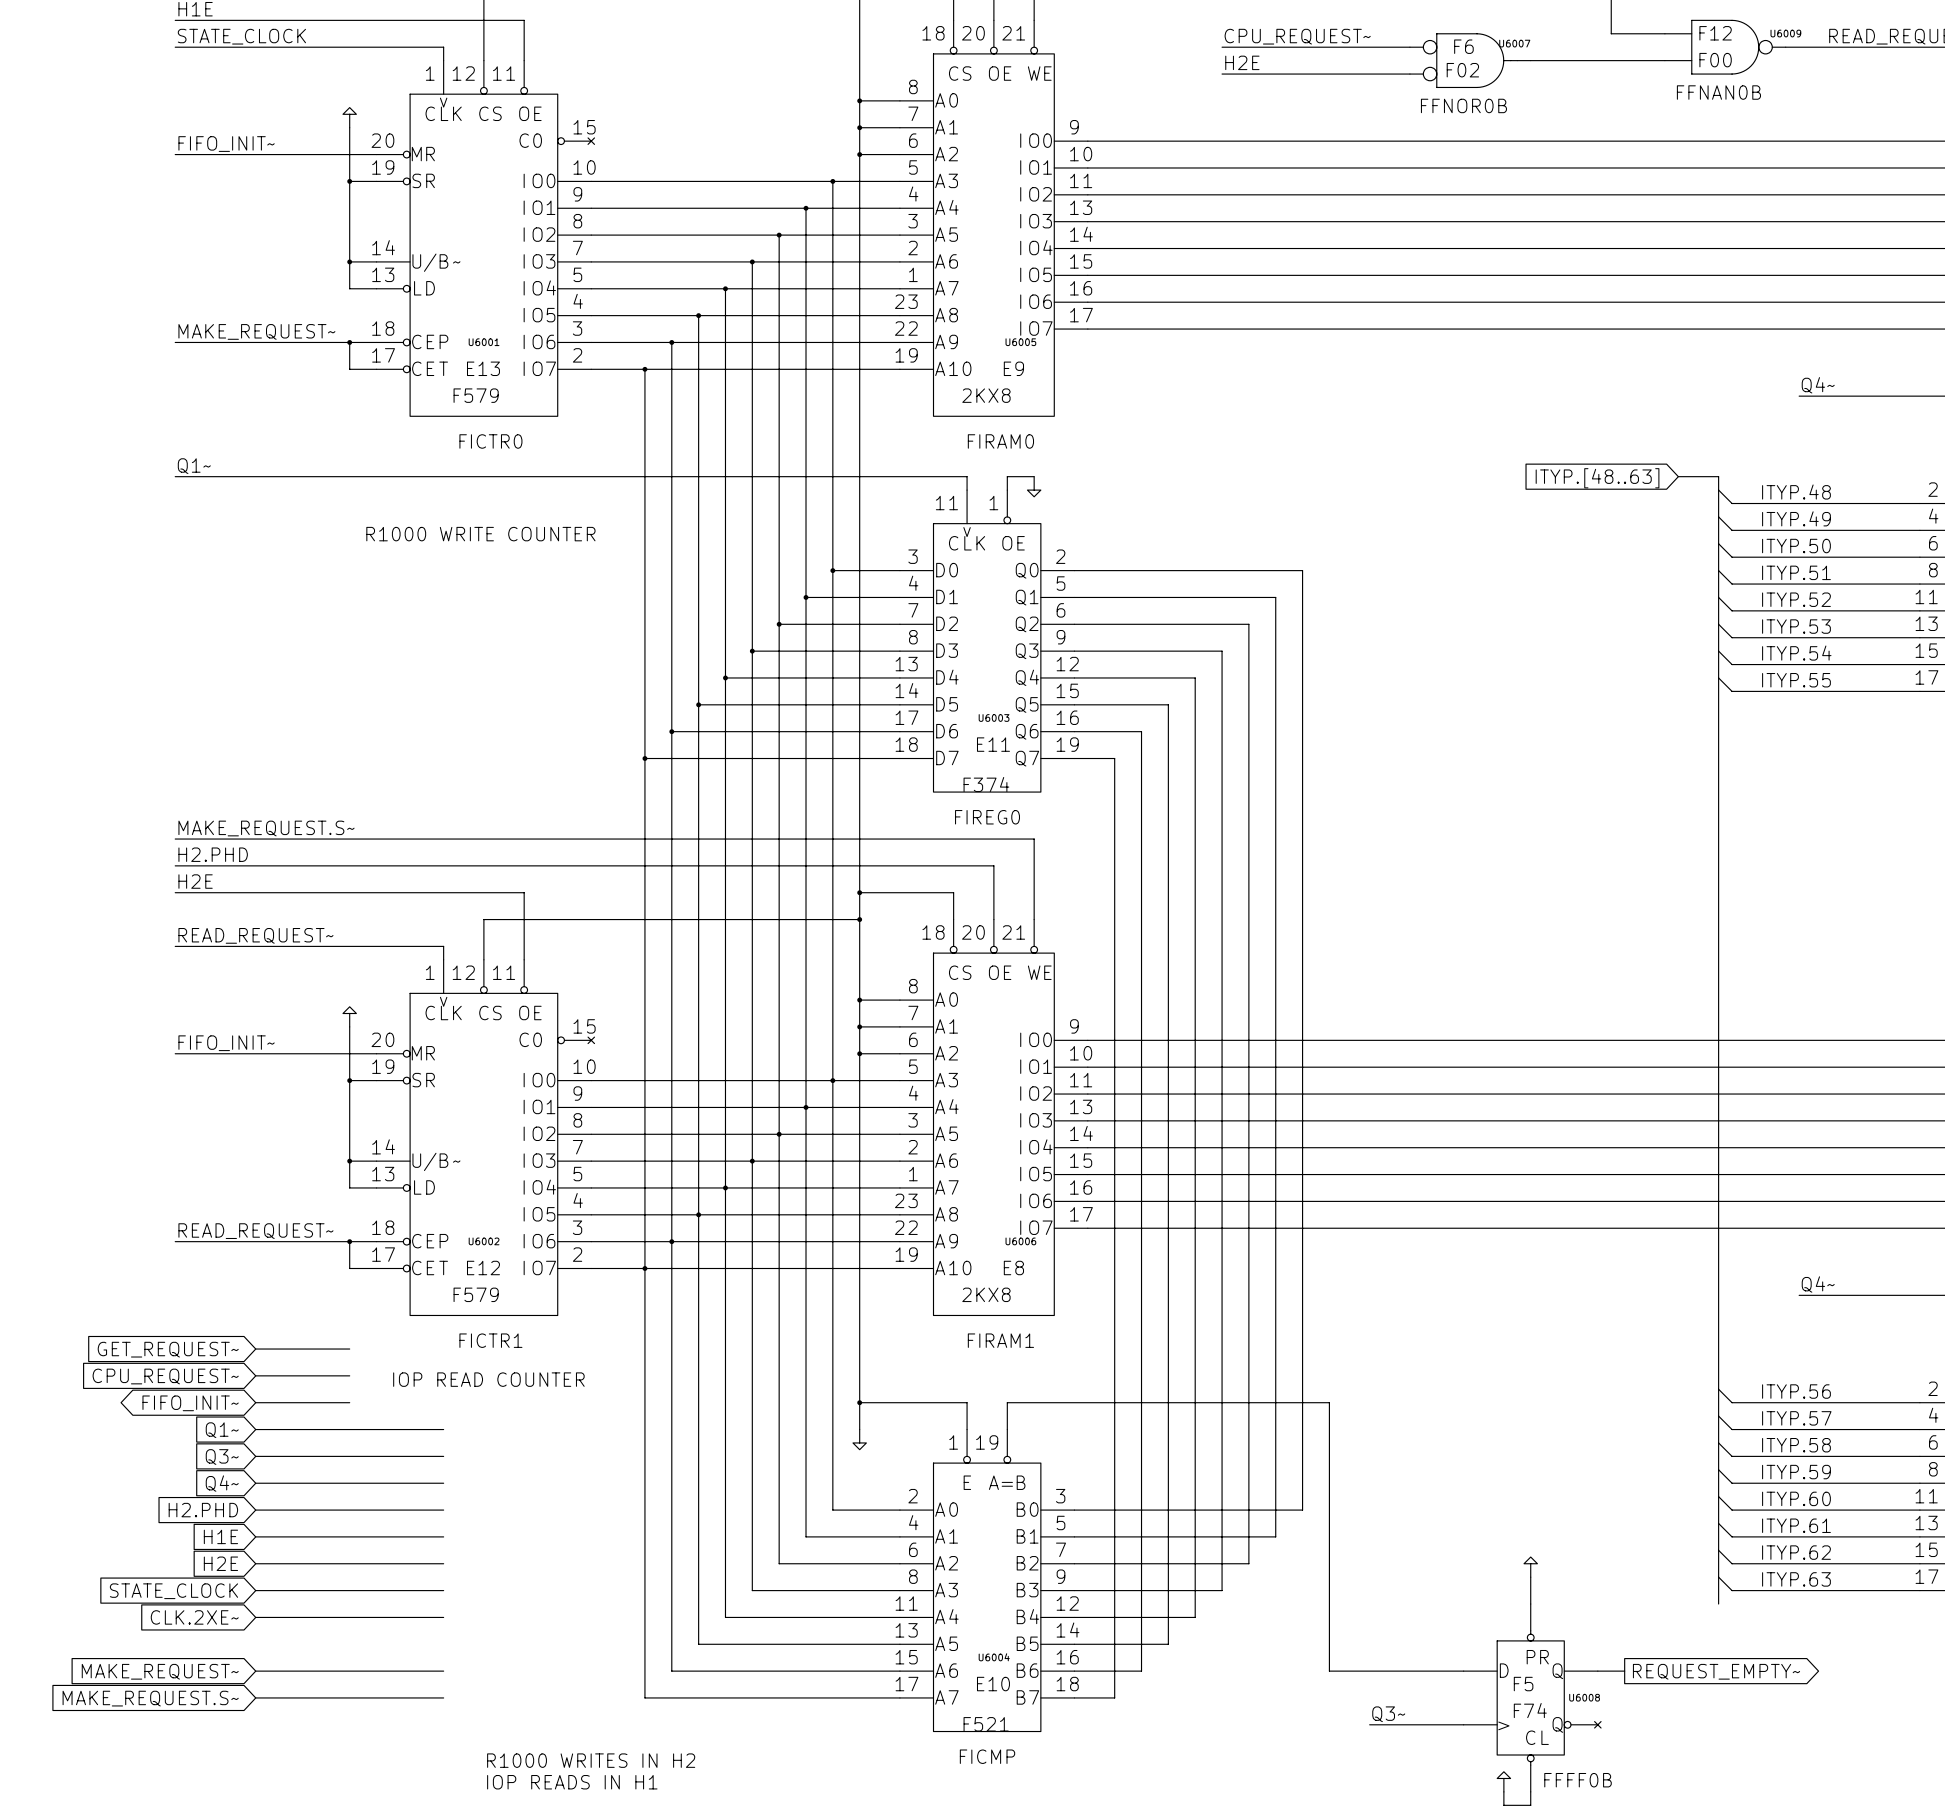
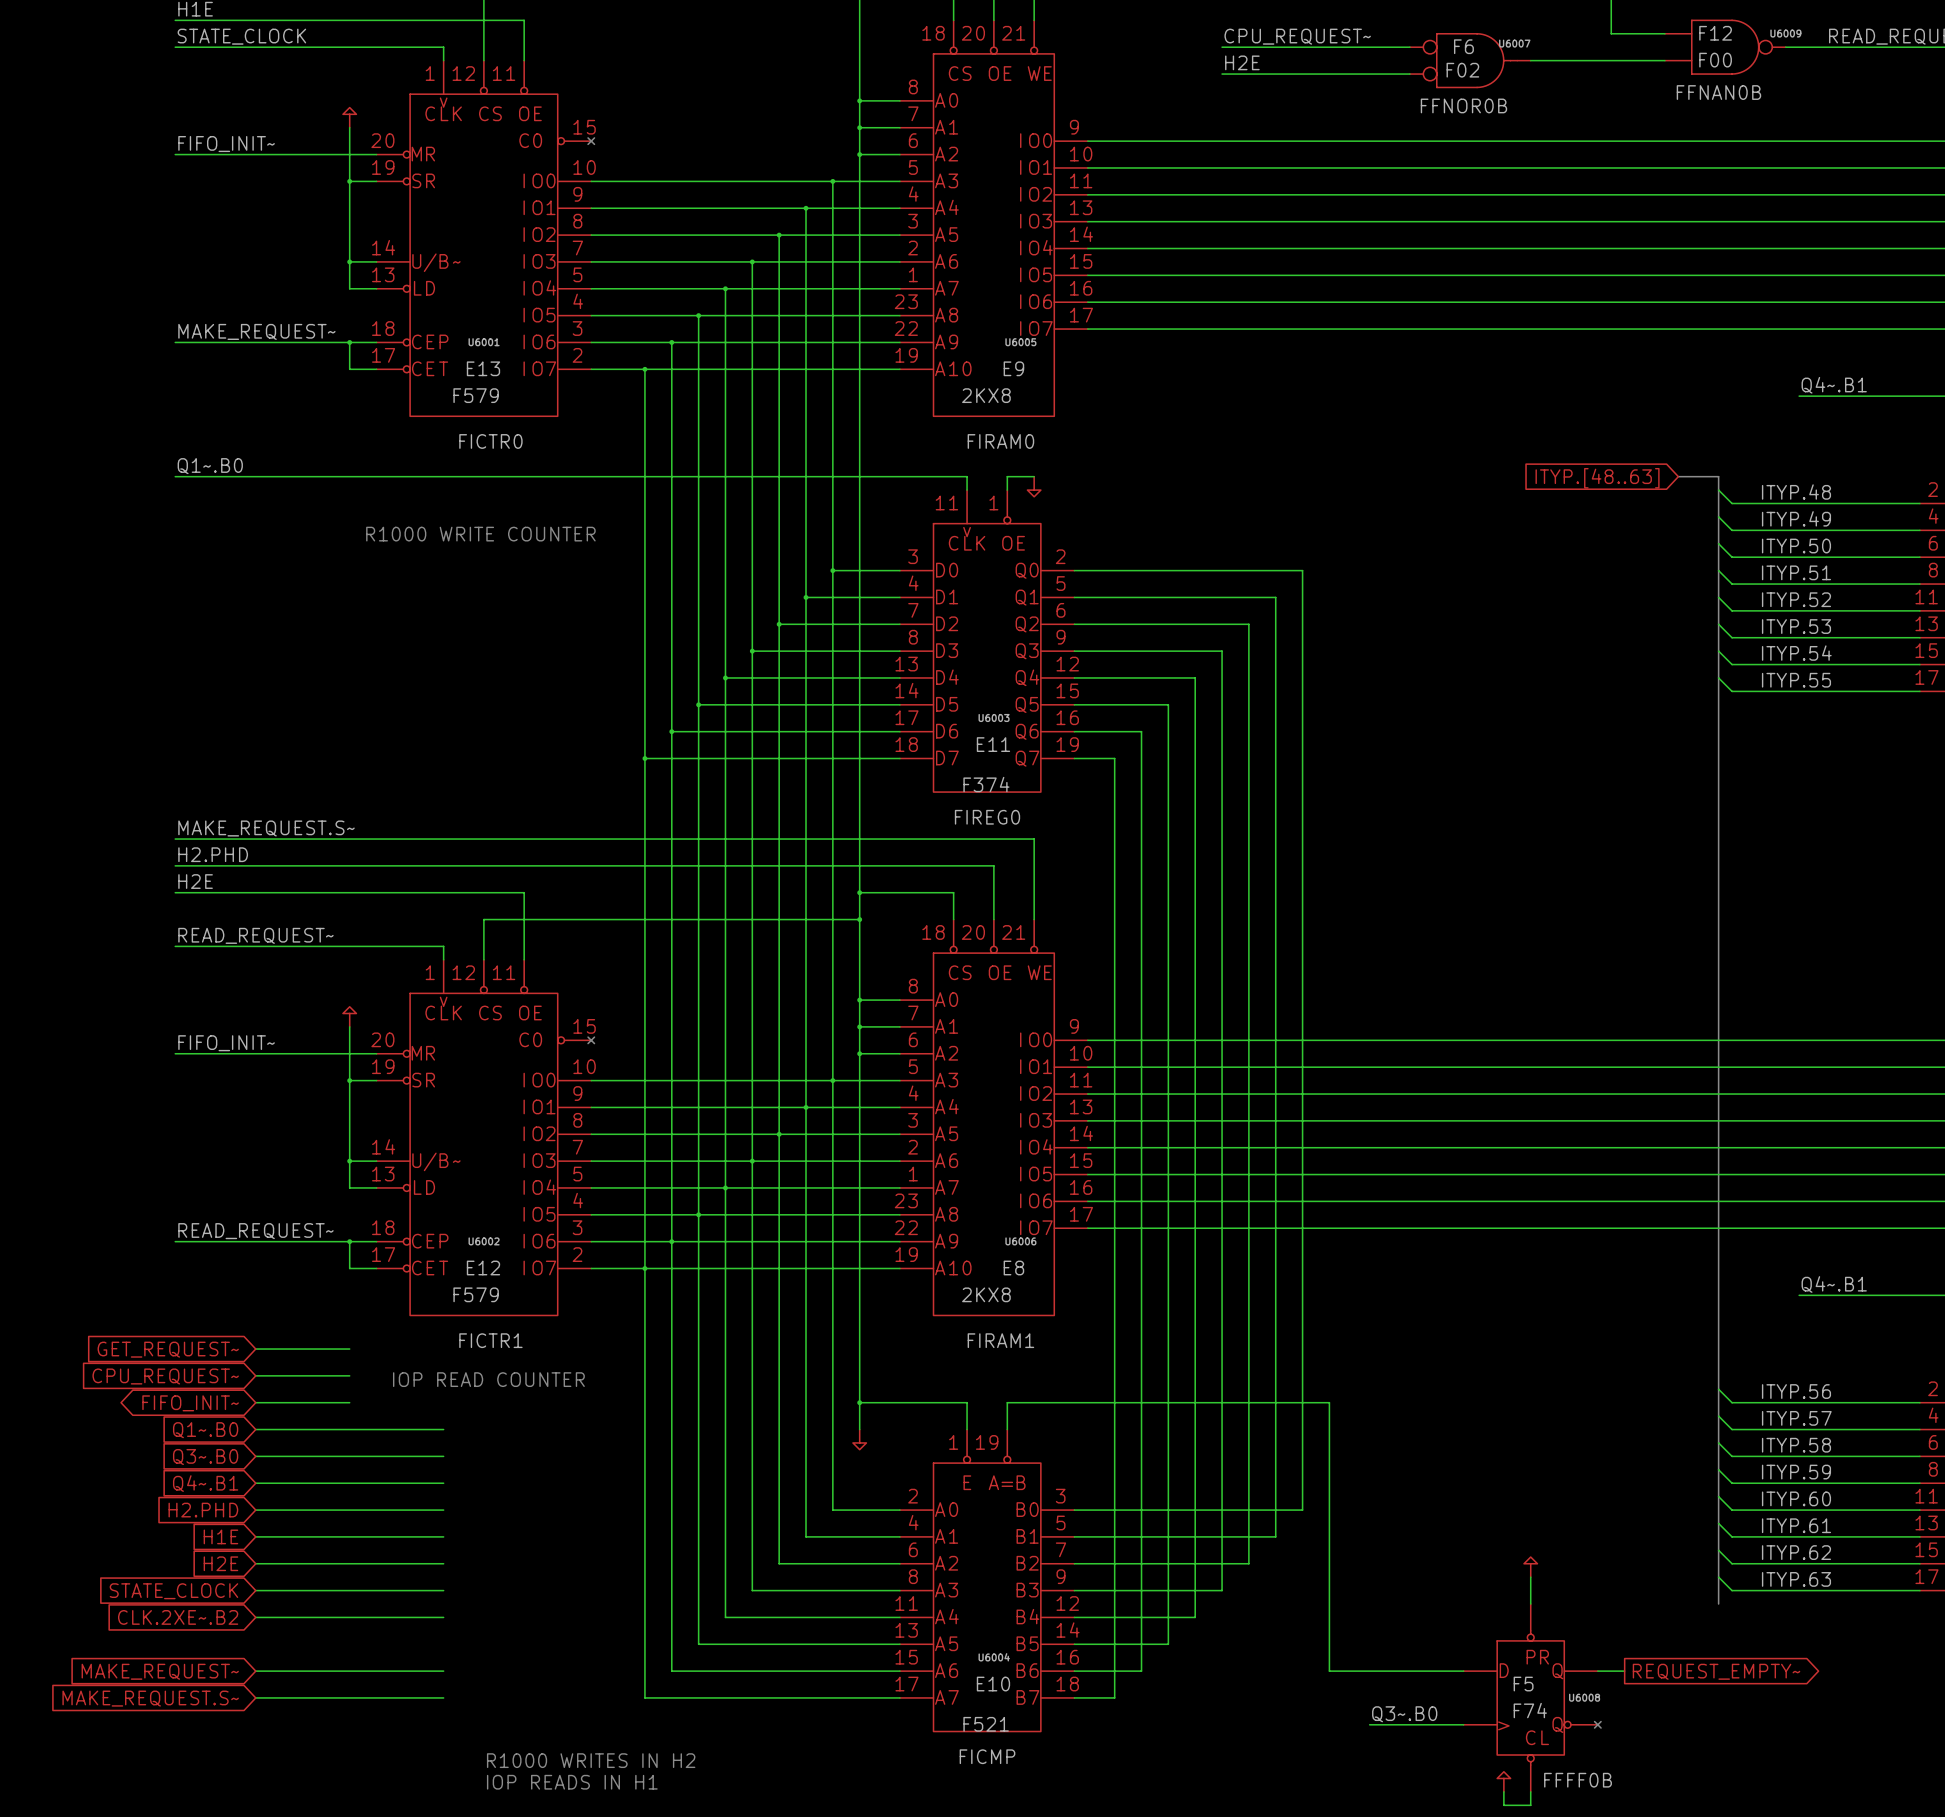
label: Q4~ (1818, 385) -> Q4~.B1 (1834, 385)
label: Q1~ (194, 466) -> Q1~.B0 (210, 466)
label: Q4~ (1818, 1284) -> Q4~.B1 (1834, 1284)
global label: Q1~ (222, 1430) -> Q1~.B0 (205, 1430)
global label: Q3~ (222, 1457) -> Q3~.B0 (205, 1457)
global label: Q4~ (222, 1483) -> Q4~.B1 (205, 1483)
global label: CLK.2XE~ (194, 1617) -> CLK.2XE~.B2 (178, 1617)
label: Q3~ (1388, 1714) -> Q3~.B0 (1404, 1714)

